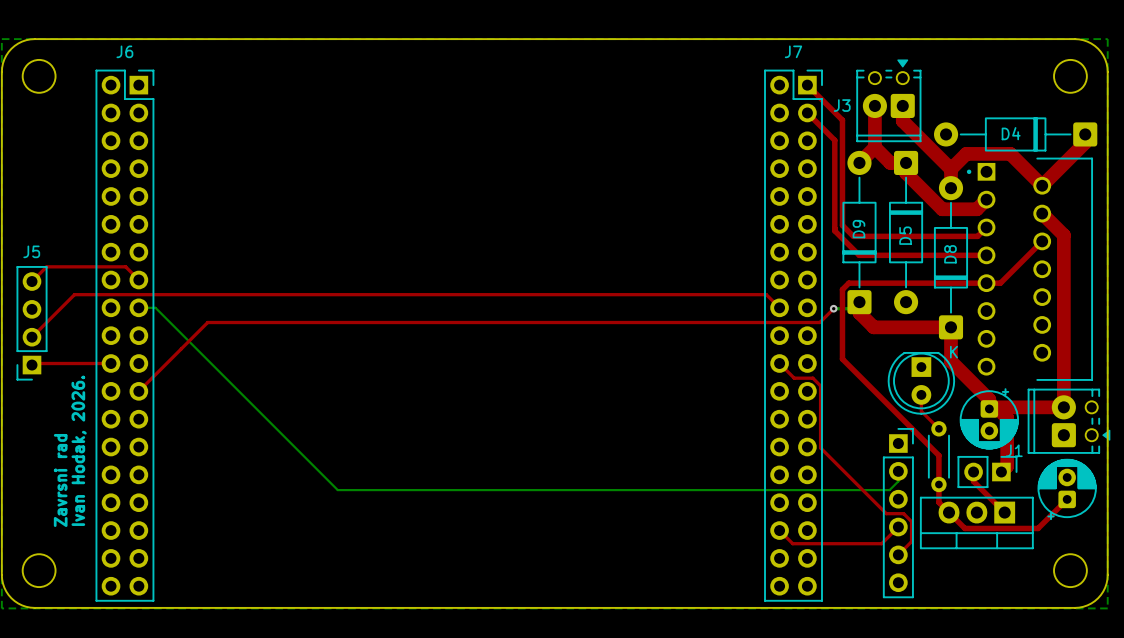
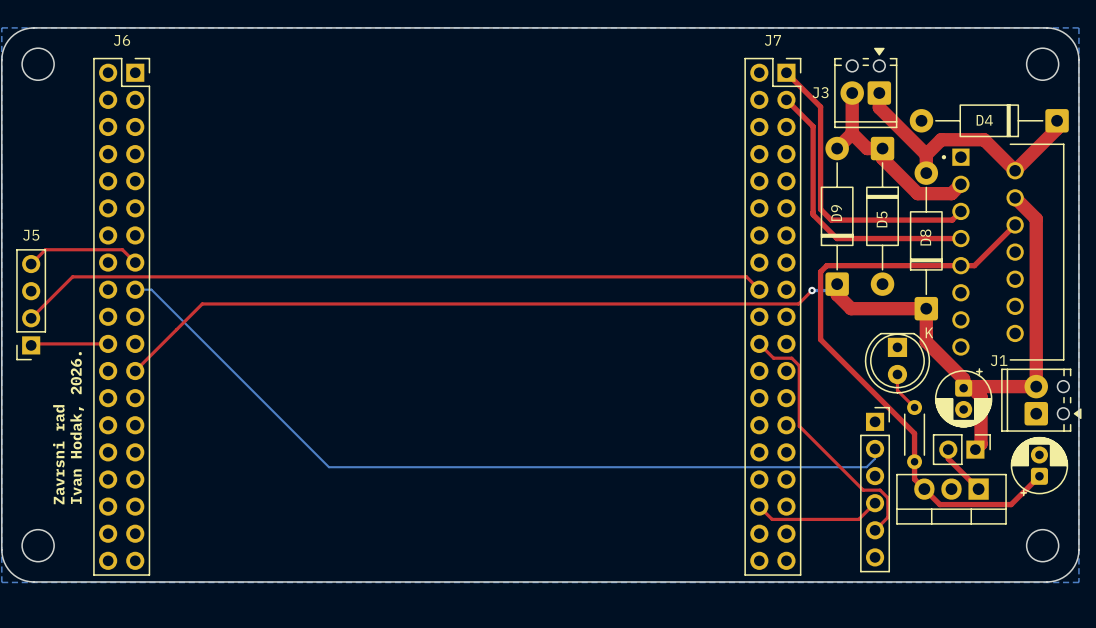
J1 name position: J1 (1014, 450) -> J1 (999, 360)

